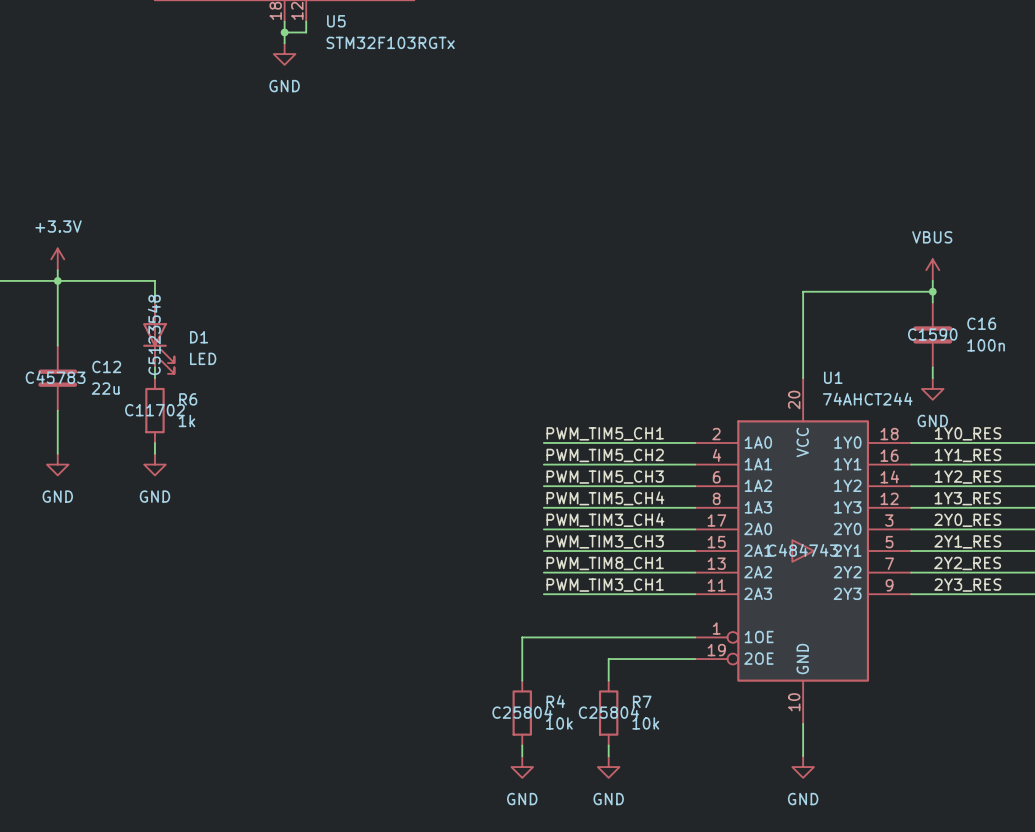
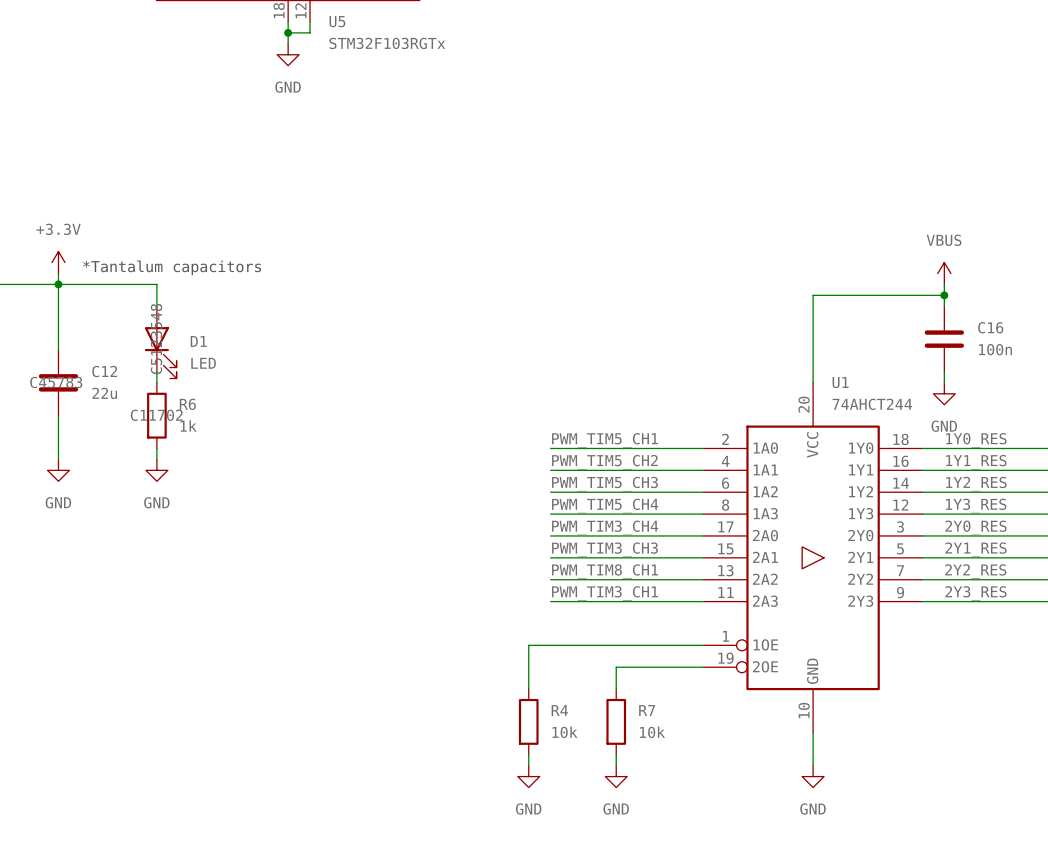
text: none -> *Tantalum capacitors (172, 267)
C16 text: C1590 (932, 334) -> none
U1 text: C484743 (803, 550) -> none
R4 text: C25804 (522, 712) -> none
R7 text: C25804 (608, 712) -> none

